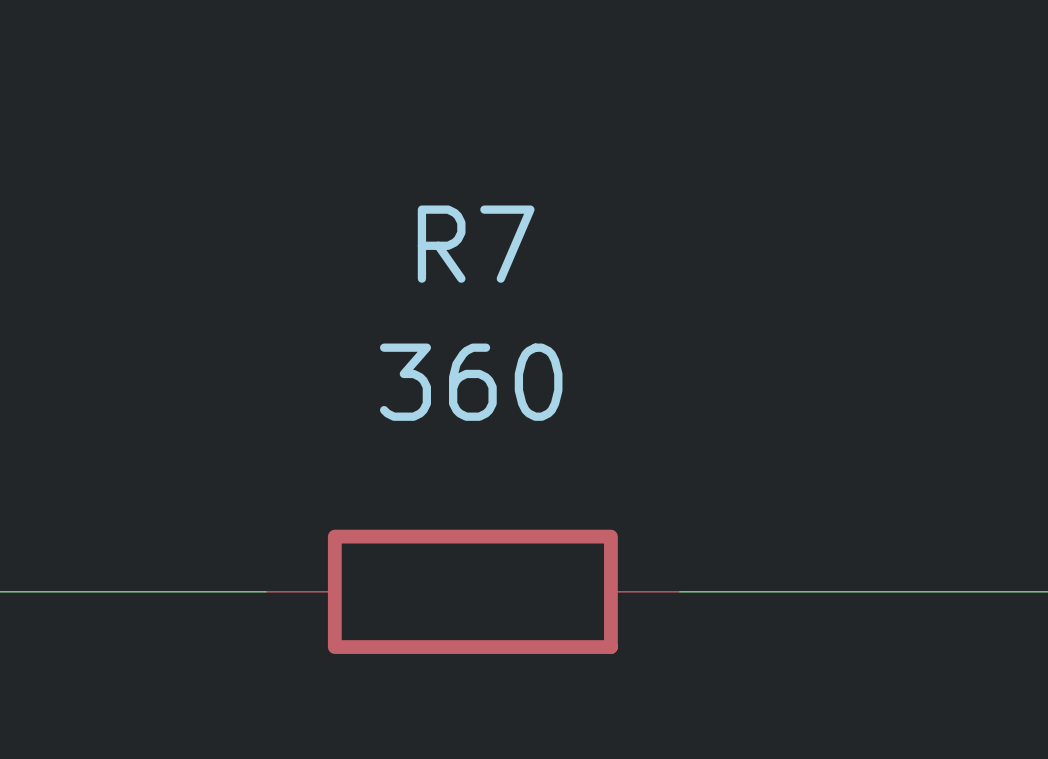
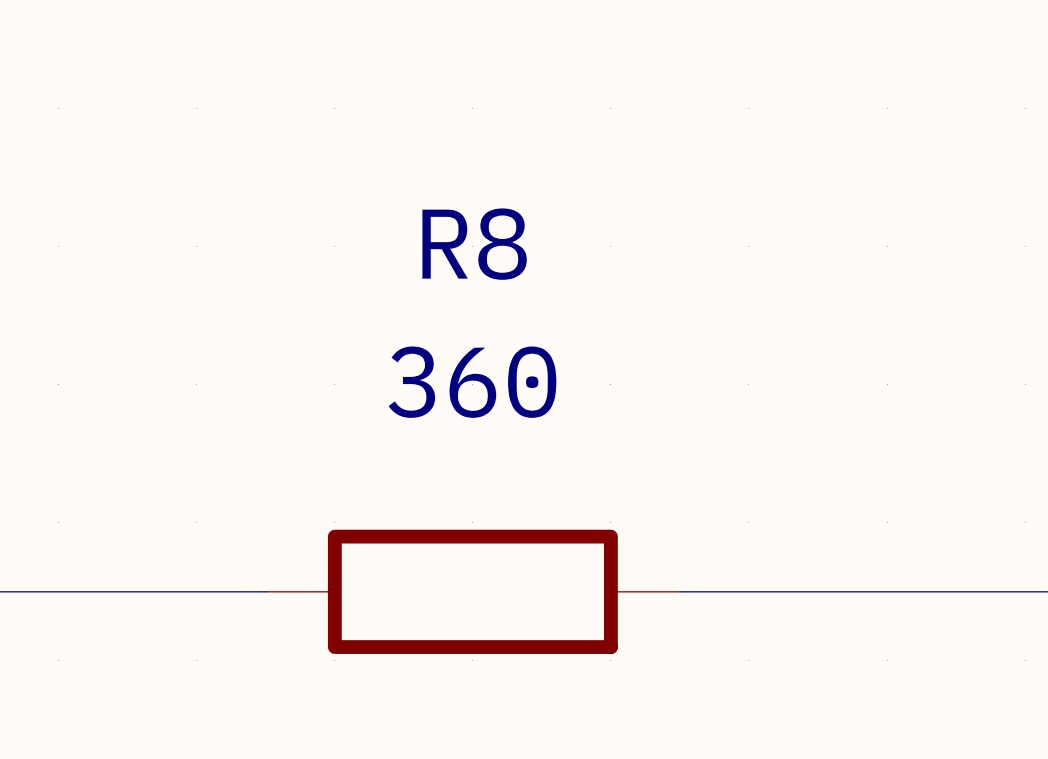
R7 name: R7 (476, 244) -> R8 (474, 244)

